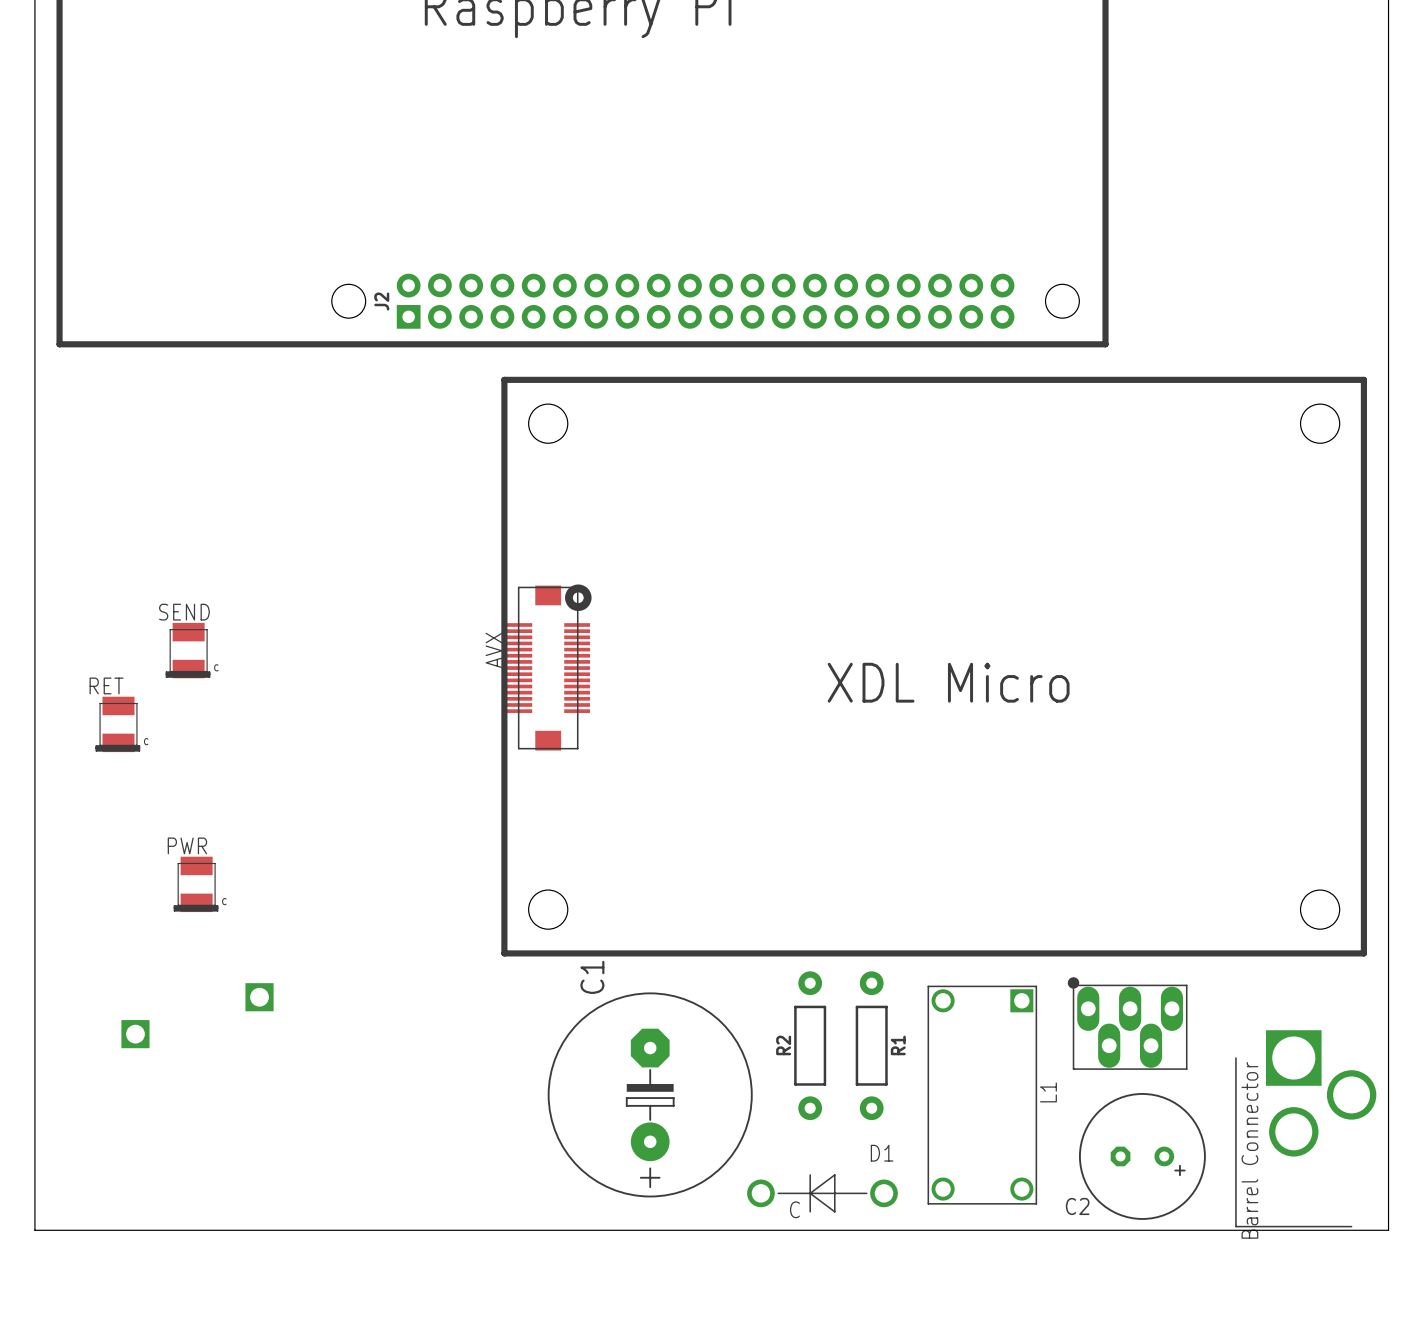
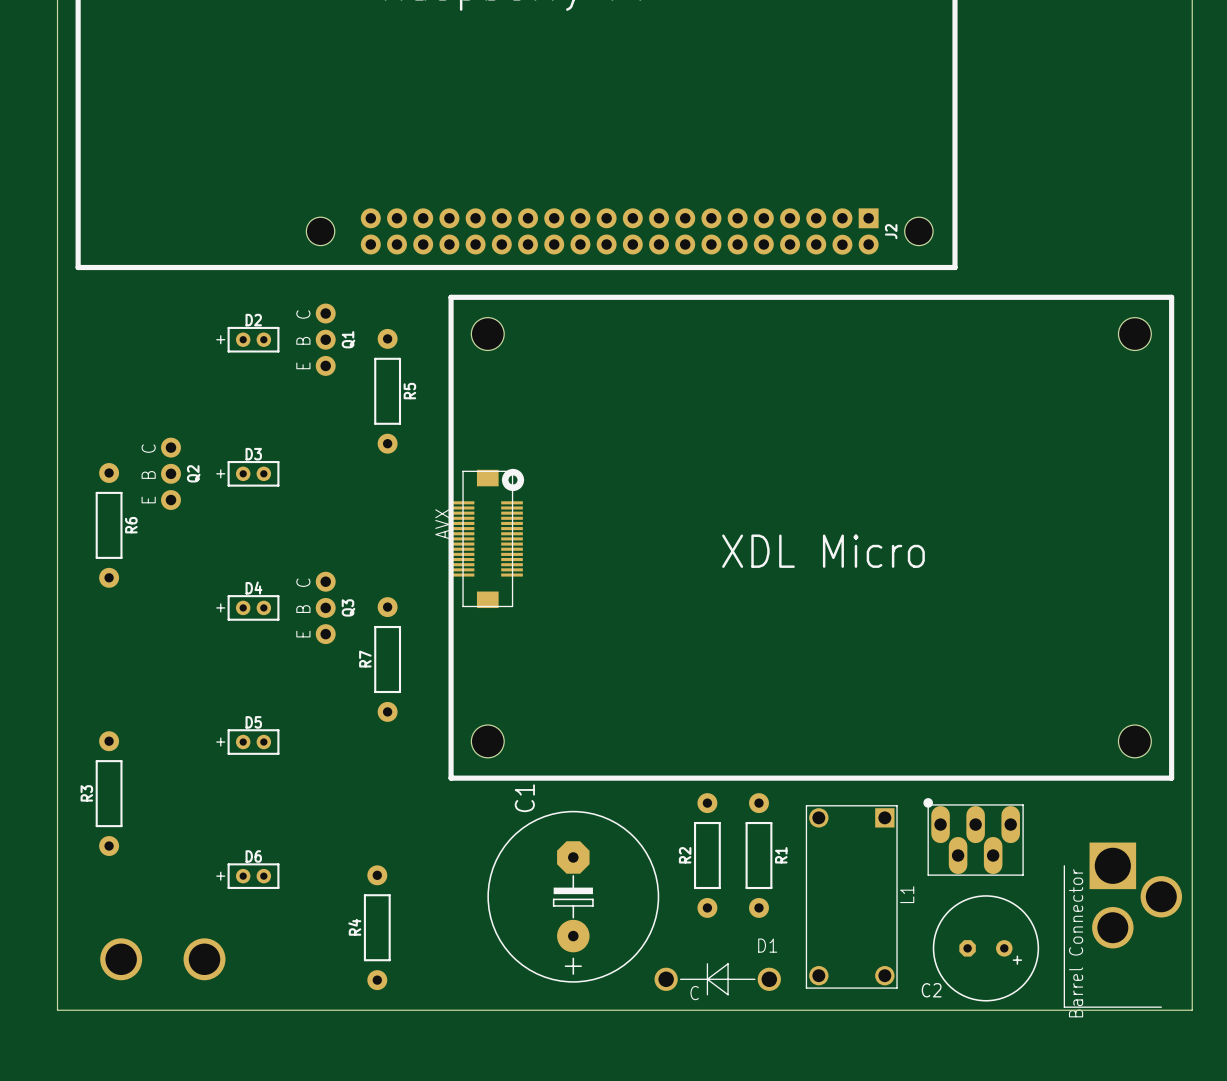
J2 rotation: 0° (705, 301) -> 180° (619, 231)
D2: none -> (247, 339)
Q1: none -> (325, 339)
R5: none -> (387, 391)
Q2: none -> (170, 473)
D3: none -> (247, 473)
SEND: (188, 650) -> none
R6: none -> (109, 525)
RET: (117, 724) -> none
D4: none -> (247, 607)
Q3: none -> (325, 607)
R7: none -> (387, 659)
PWR: (196, 884) -> none
D5: none -> (247, 742)
R3: none -> (109, 793)
part: (259, 997) -> none
part: (135, 1034) -> none
D6: none -> (247, 876)
R4: none -> (377, 927)
part: none -> (121, 959)
part: none -> (204, 959)

